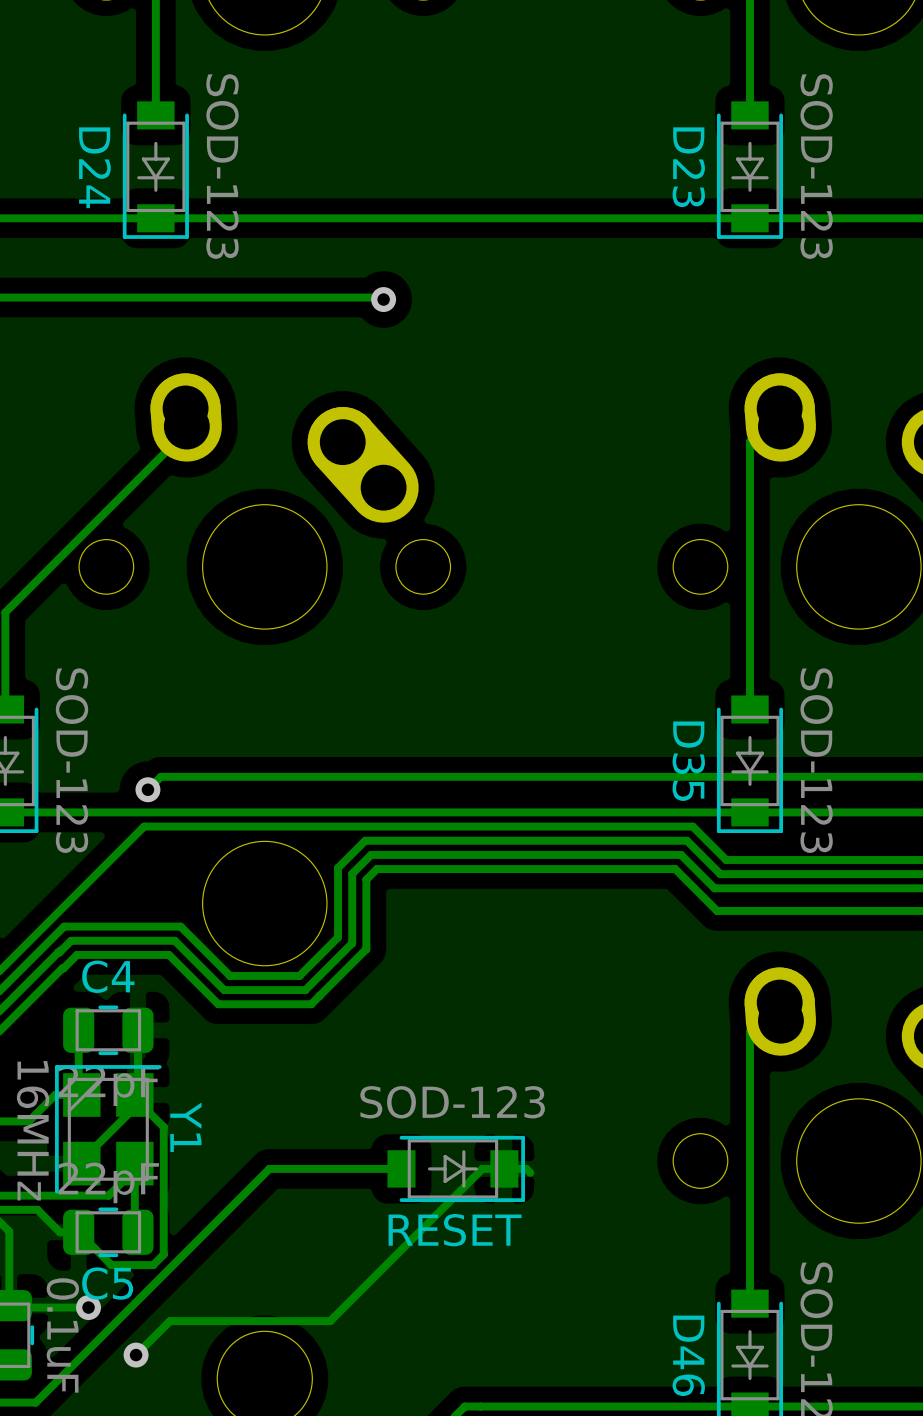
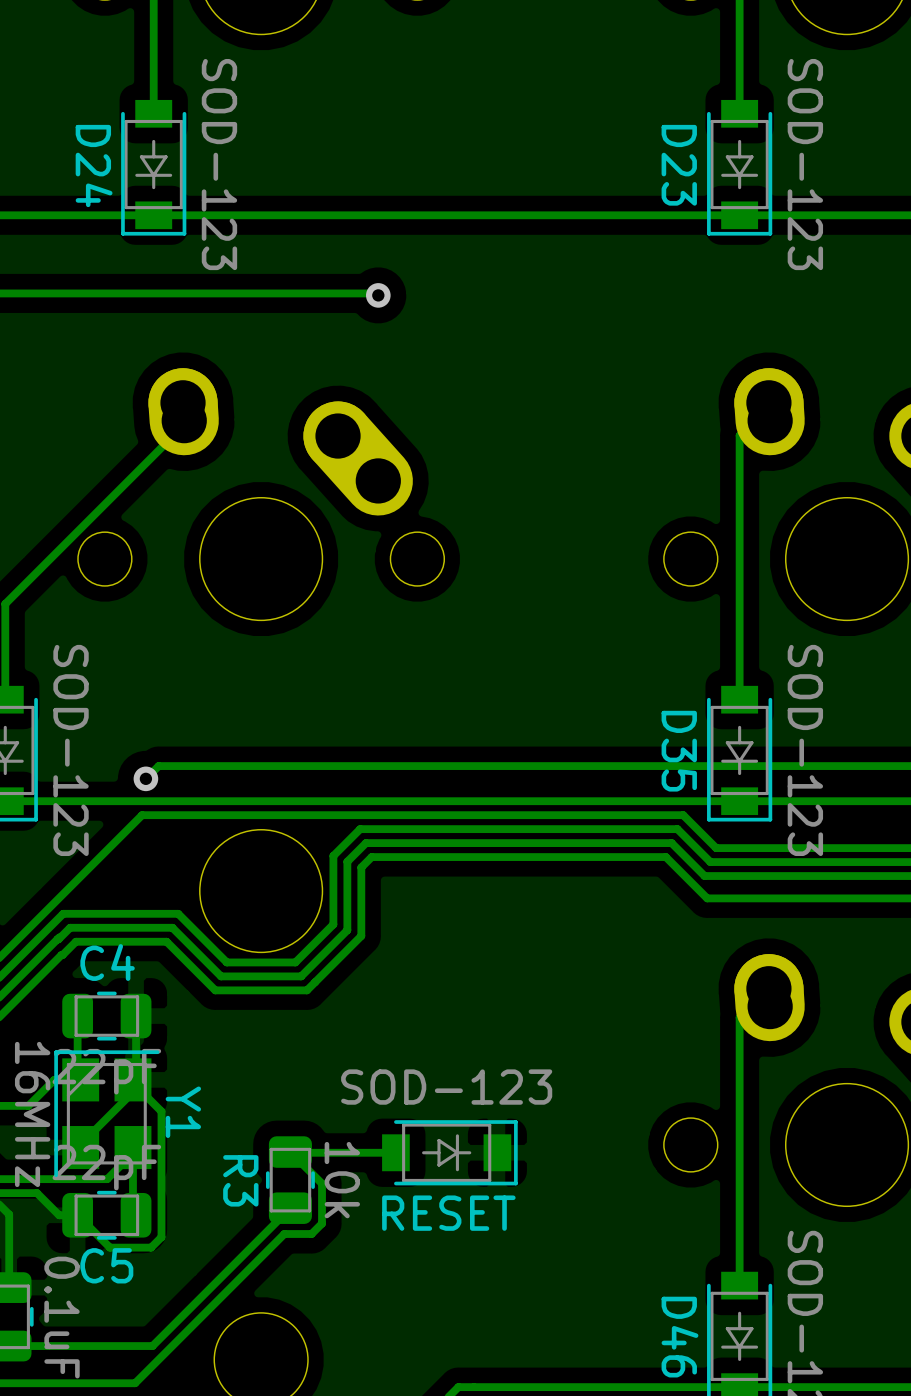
track: (295, 1168) (269, 1168) (35, 1402) -> (290, 1152) (322, 1183) (322, 1223) (311, 1234) (284, 1234) (135, 1383) (35, 1383)
track: (530, 1172) (526, 1168) (482, 1168) (330, 1321) (170, 1321) (136, 1355) -> none
R3: none -> 10k (290, 1180)
track: none -> (290, 1208) (152, 1346) (9, 1346)
track: (88, 1307) (11, 1307) -> none
via: (88, 1307) -> none
via: (136, 1355) -> none

